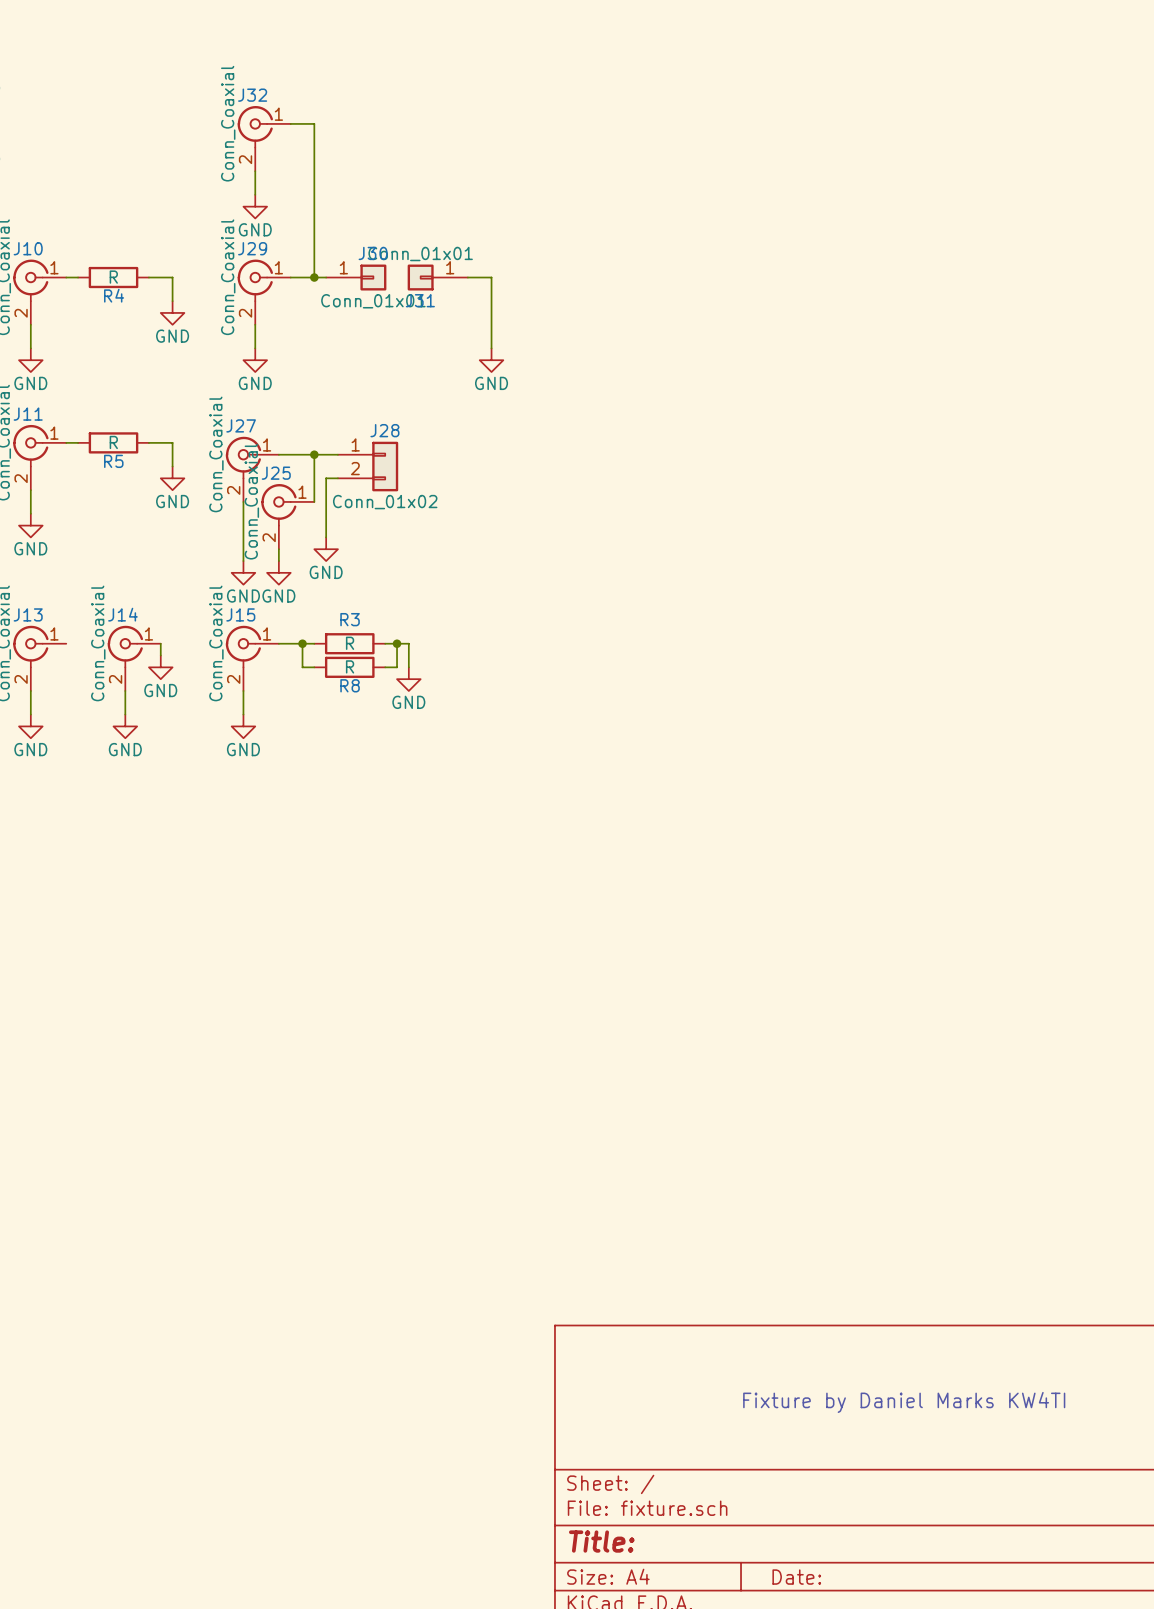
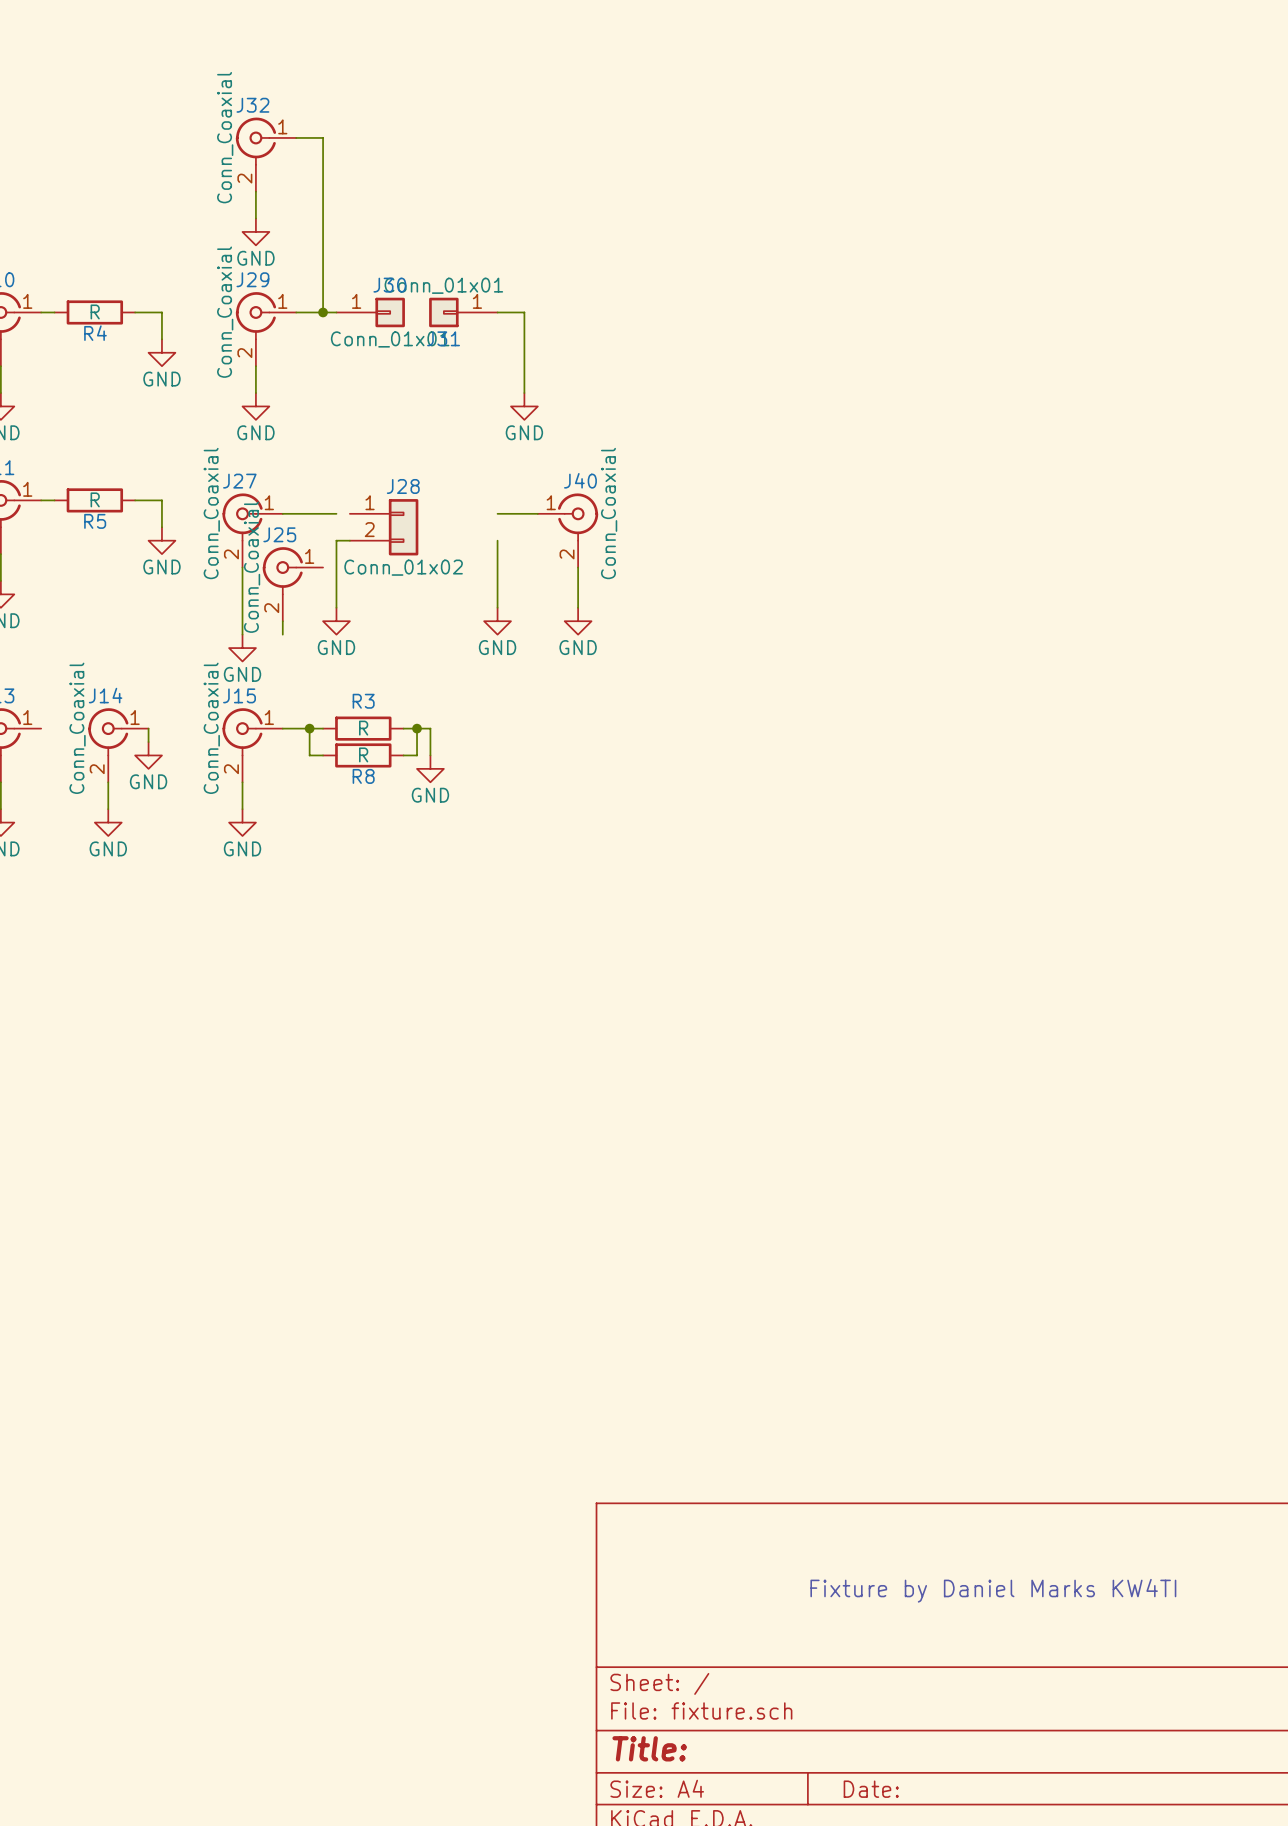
wire: (314, 454) (314, 501) -> none
junction: (314, 454) -> none
wire: (326, 454) (337, 454) -> none
wire: none -> (497, 513) (537, 513)
J40: none -> Conn_Coaxial (568, 530)
wire: none -> (497, 540) (497, 607)
wire: none -> (578, 567) (578, 607)
power symbol: none -> GND (497, 621)
power symbol: none -> GND (578, 621)
power symbol: GND (278, 572) -> none

